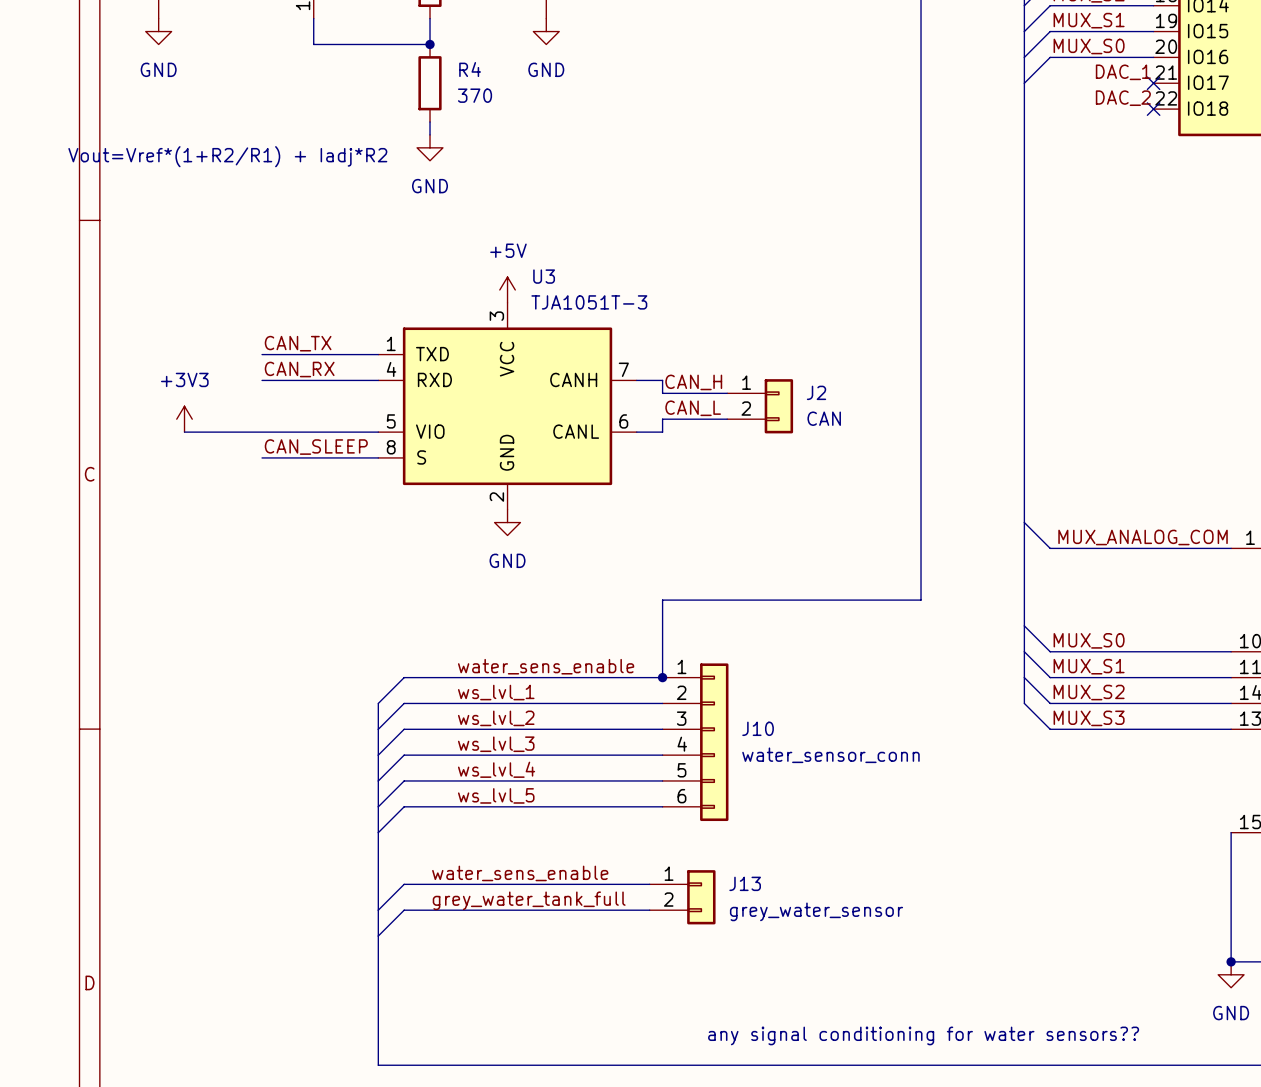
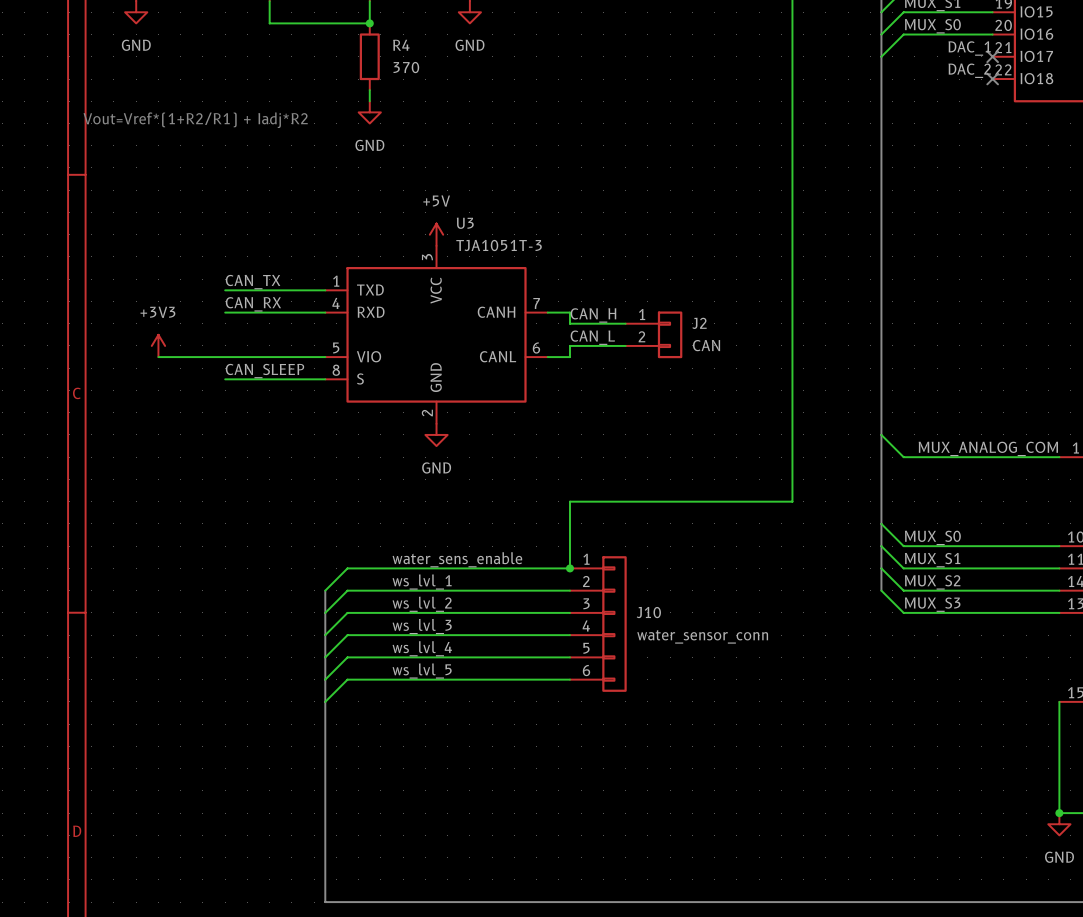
label: water_sens_enable (520, 873) -> none
wire: (649, 884) (404, 884) (378, 910) -> none
J13: grey_water_sensor (682, 897) -> none
label: grey_water_tank_full (529, 900) -> none
wire: (649, 910) (404, 910) (378, 936) -> none
text: any signal conditioning for water sensors?? (923, 1035) -> none

